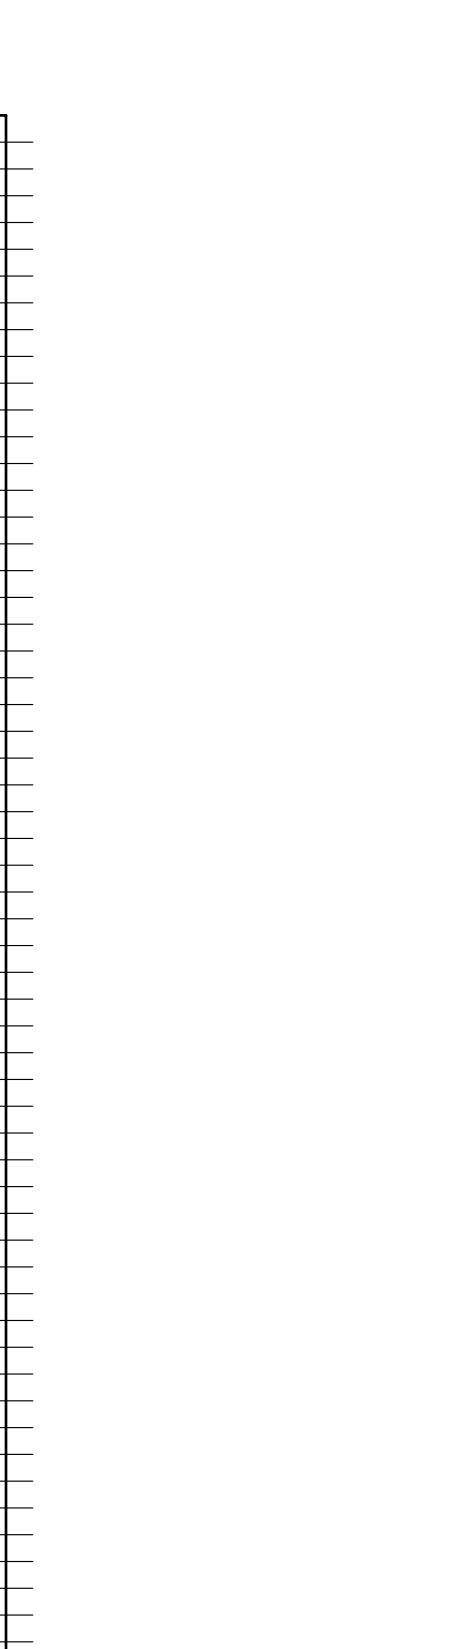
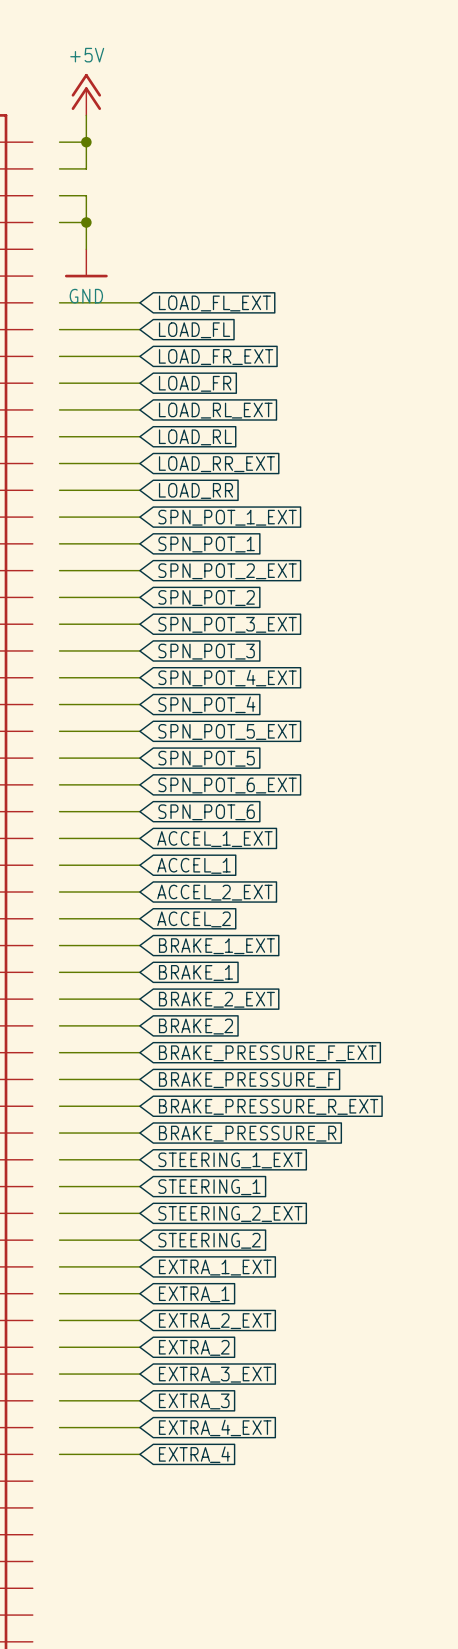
power symbol: none -> +5V (86, 94)
wire: none -> (86, 115) (86, 168) (59, 168)
wire: none -> (59, 142) (86, 142)
junction: none -> (86, 142)
wire: none -> (59, 195) (86, 195) (86, 249)
wire: none -> (59, 222) (86, 222)
junction: none -> (86, 222)
power symbol: none -> GND (86, 263)
wire: none -> (59, 302) (139, 302)
global label: none -> LOAD_FL_EXT (214, 303)
wire: none -> (59, 329) (139, 329)
global label: none -> LOAD_FL (194, 330)
wire: none -> (59, 356) (139, 356)
global label: none -> LOAD_FR_EXT (216, 357)
wire: none -> (59, 383) (139, 383)
global label: none -> LOAD_FR (195, 383)
wire: none -> (59, 409) (139, 409)
global label: none -> LOAD_RL_EXT (215, 410)
wire: none -> (59, 436) (139, 436)
global label: none -> LOAD_RL (195, 437)
wire: none -> (59, 463) (139, 463)
global label: none -> LOAD_RR_EXT (216, 464)
wire: none -> (59, 490) (139, 490)
global label: none -> LOAD_RR (195, 490)
wire: none -> (59, 517) (139, 517)
global label: none -> SPN_POT_1_EXT (227, 517)
wire: none -> (59, 543) (139, 543)
global label: none -> SPN_POT_1 (206, 544)
wire: none -> (59, 570) (139, 570)
global label: none -> SPN_POT_2_EXT (227, 571)
wire: none -> (59, 597) (139, 597)
global label: none -> SPN_POT_2 (206, 598)
wire: none -> (59, 624) (139, 624)
global label: none -> SPN_POT_3_EXT (227, 624)
wire: none -> (59, 650) (139, 650)
global label: none -> SPN_POT_3 (206, 651)
wire: none -> (59, 677) (139, 677)
global label: none -> SPN_POT_4_EXT (227, 678)
wire: none -> (59, 704) (139, 704)
global label: none -> SPN_POT_4 (206, 704)
wire: none -> (59, 731) (139, 731)
global label: none -> SPN_POT_5_EXT (227, 731)
wire: none -> (59, 758) (139, 758)
global label: none -> SPN_POT_5 (206, 758)
wire: none -> (59, 784) (139, 784)
global label: none -> SPN_POT_6_EXT (227, 785)
wire: none -> (59, 811) (139, 811)
global label: none -> SPN_POT_6 (206, 812)
wire: none -> (59, 838) (139, 838)
global label: none -> ACCEL_1_EXT (214, 839)
wire: none -> (59, 865) (139, 865)
global label: none -> ACCEL_1 (193, 865)
wire: none -> (59, 892) (139, 892)
global label: none -> ACCEL_2_EXT (214, 892)
wire: none -> (59, 918) (139, 918)
global label: none -> ACCEL_2 (193, 919)
wire: none -> (59, 945) (139, 945)
global label: none -> BRAKE_1_EXT (216, 946)
wire: none -> (59, 972) (139, 972)
global label: none -> BRAKE_1 (195, 972)
wire: none -> (59, 999) (139, 999)
global label: none -> BRAKE_2_EXT (216, 999)
wire: none -> (59, 1025) (139, 1025)
global label: none -> BRAKE_2 (195, 1026)
wire: none -> (59, 1052) (139, 1052)
global label: none -> BRAKE_PRESSURE_F_EXT (267, 1053)
wire: none -> (59, 1079) (139, 1079)
global label: none -> BRAKE_PRESSURE_F (247, 1080)
wire: none -> (59, 1106) (139, 1106)
global label: none -> BRAKE_PRESSURE_R_EXT (268, 1106)
wire: none -> (59, 1133) (139, 1133)
global label: none -> BRAKE_PRESSURE_R (247, 1133)
wire: none -> (59, 1159) (139, 1159)
global label: none -> STEERING_1_EXT (230, 1160)
wire: none -> (59, 1186) (139, 1186)
global label: none -> STEERING_1 (209, 1187)
wire: none -> (59, 1213) (139, 1213)
global label: none -> STEERING_2_EXT (230, 1213)
wire: none -> (59, 1240) (139, 1240)
global label: none -> STEERING_2 (209, 1240)
wire: none -> (59, 1266) (139, 1266)
global label: none -> EXTRA_1_EXT (215, 1267)
wire: none -> (59, 1293) (139, 1293)
global label: none -> EXTRA_1 (194, 1294)
wire: none -> (59, 1320) (139, 1320)
global label: none -> EXTRA_2_EXT (215, 1321)
wire: none -> (59, 1347) (139, 1347)
global label: none -> EXTRA_2 (194, 1347)
wire: none -> (59, 1374) (139, 1374)
global label: none -> EXTRA_3_EXT (215, 1374)
wire: none -> (59, 1400) (139, 1400)
global label: none -> EXTRA_3 (194, 1401)
wire: none -> (59, 1427) (139, 1427)
global label: none -> EXTRA_4_EXT (215, 1427)
wire: none -> (59, 1454) (139, 1454)
global label: none -> EXTRA_4 (194, 1454)

